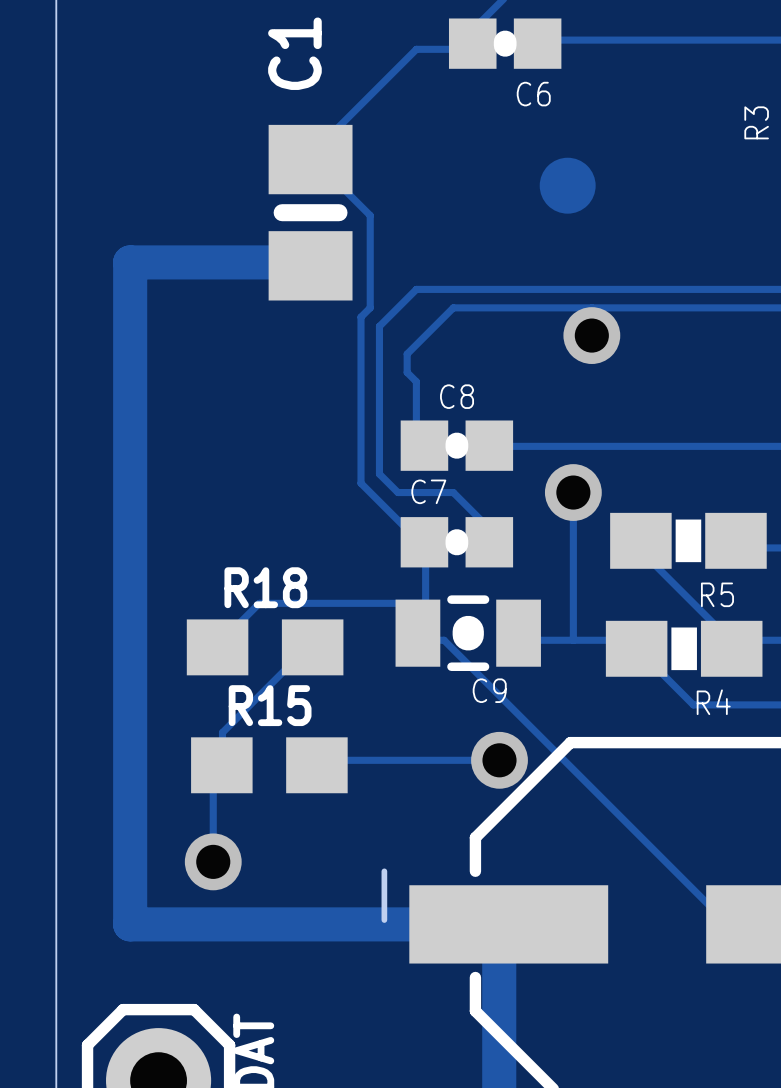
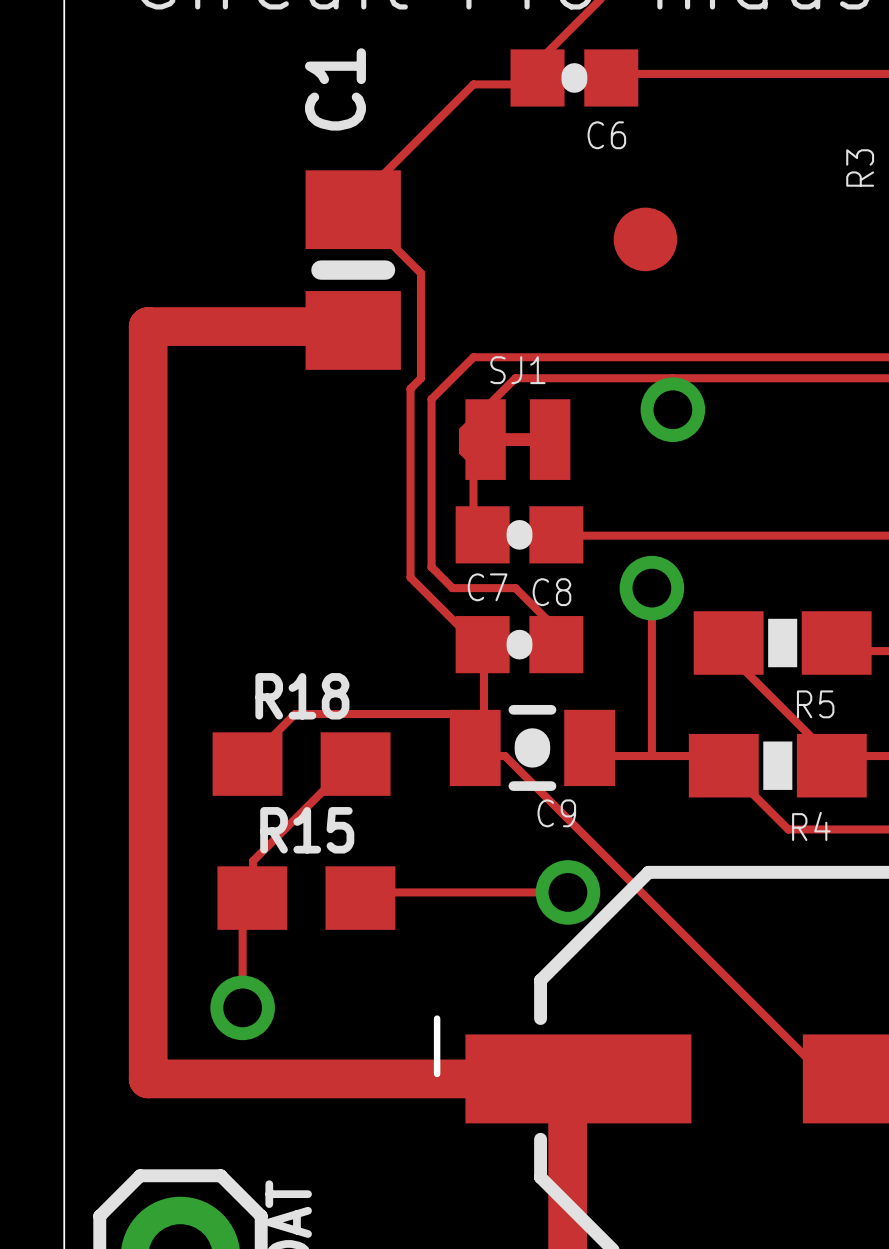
SJ1: none -> (517, 439)
C8 name position: C8 (457, 396) -> C8 (551, 592)

